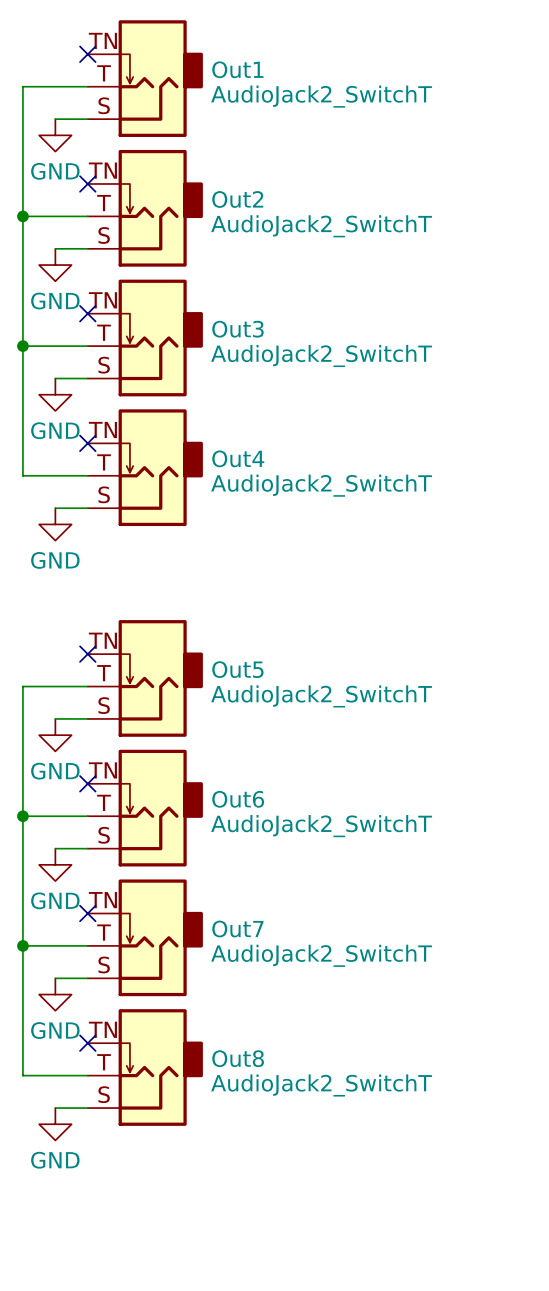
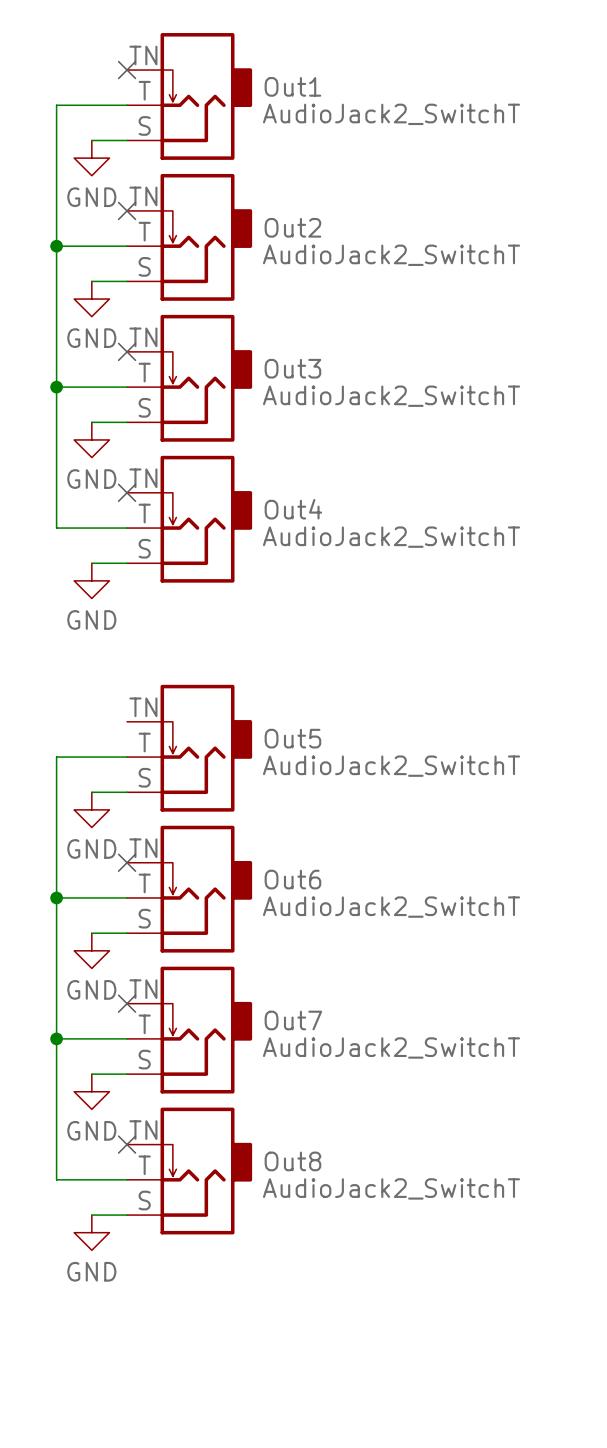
no-connect mark: (87, 654) -> none

